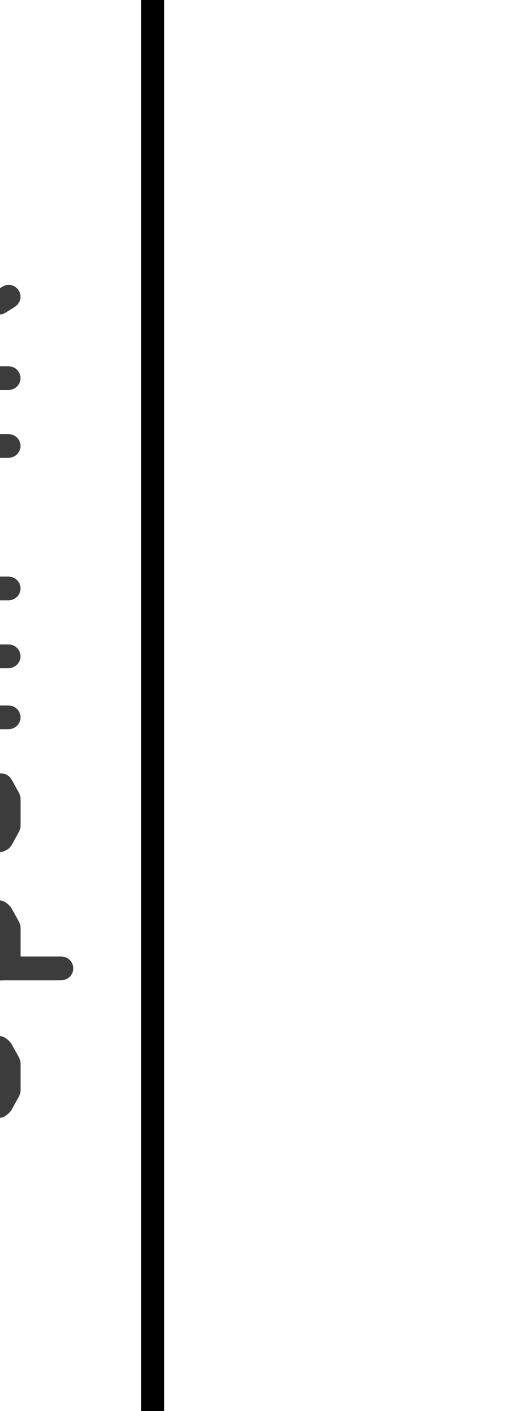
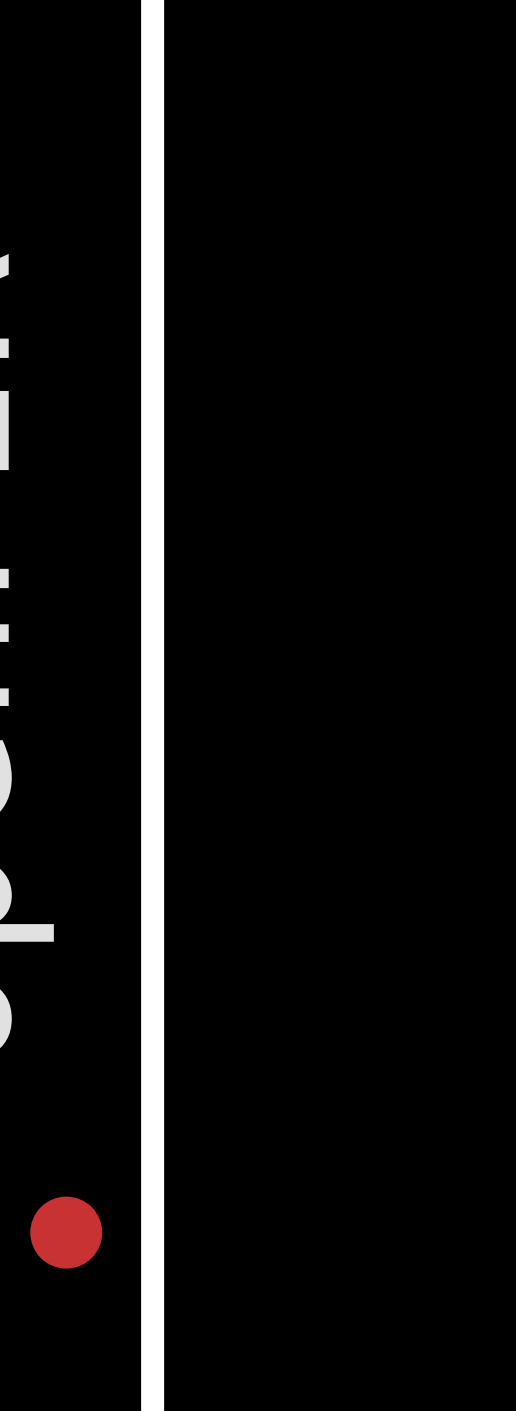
part: none -> (66, 1232)

